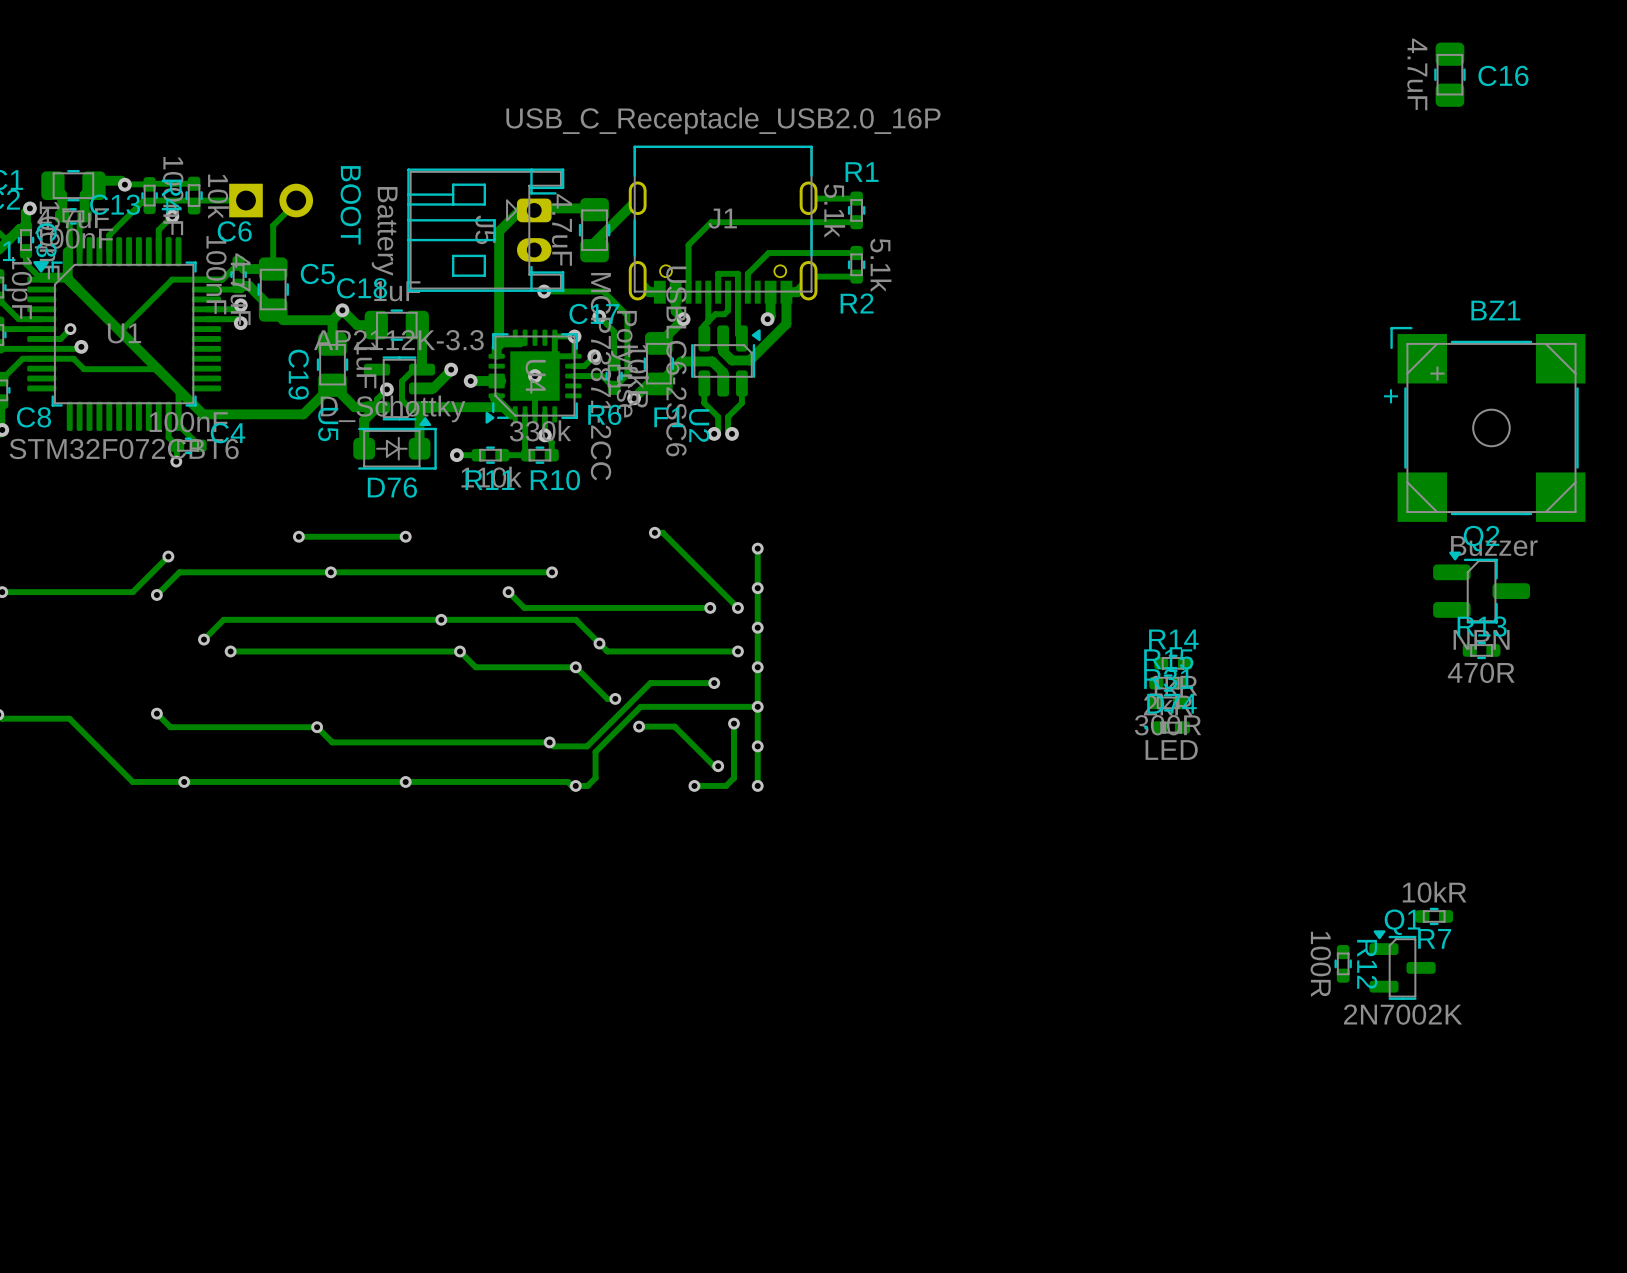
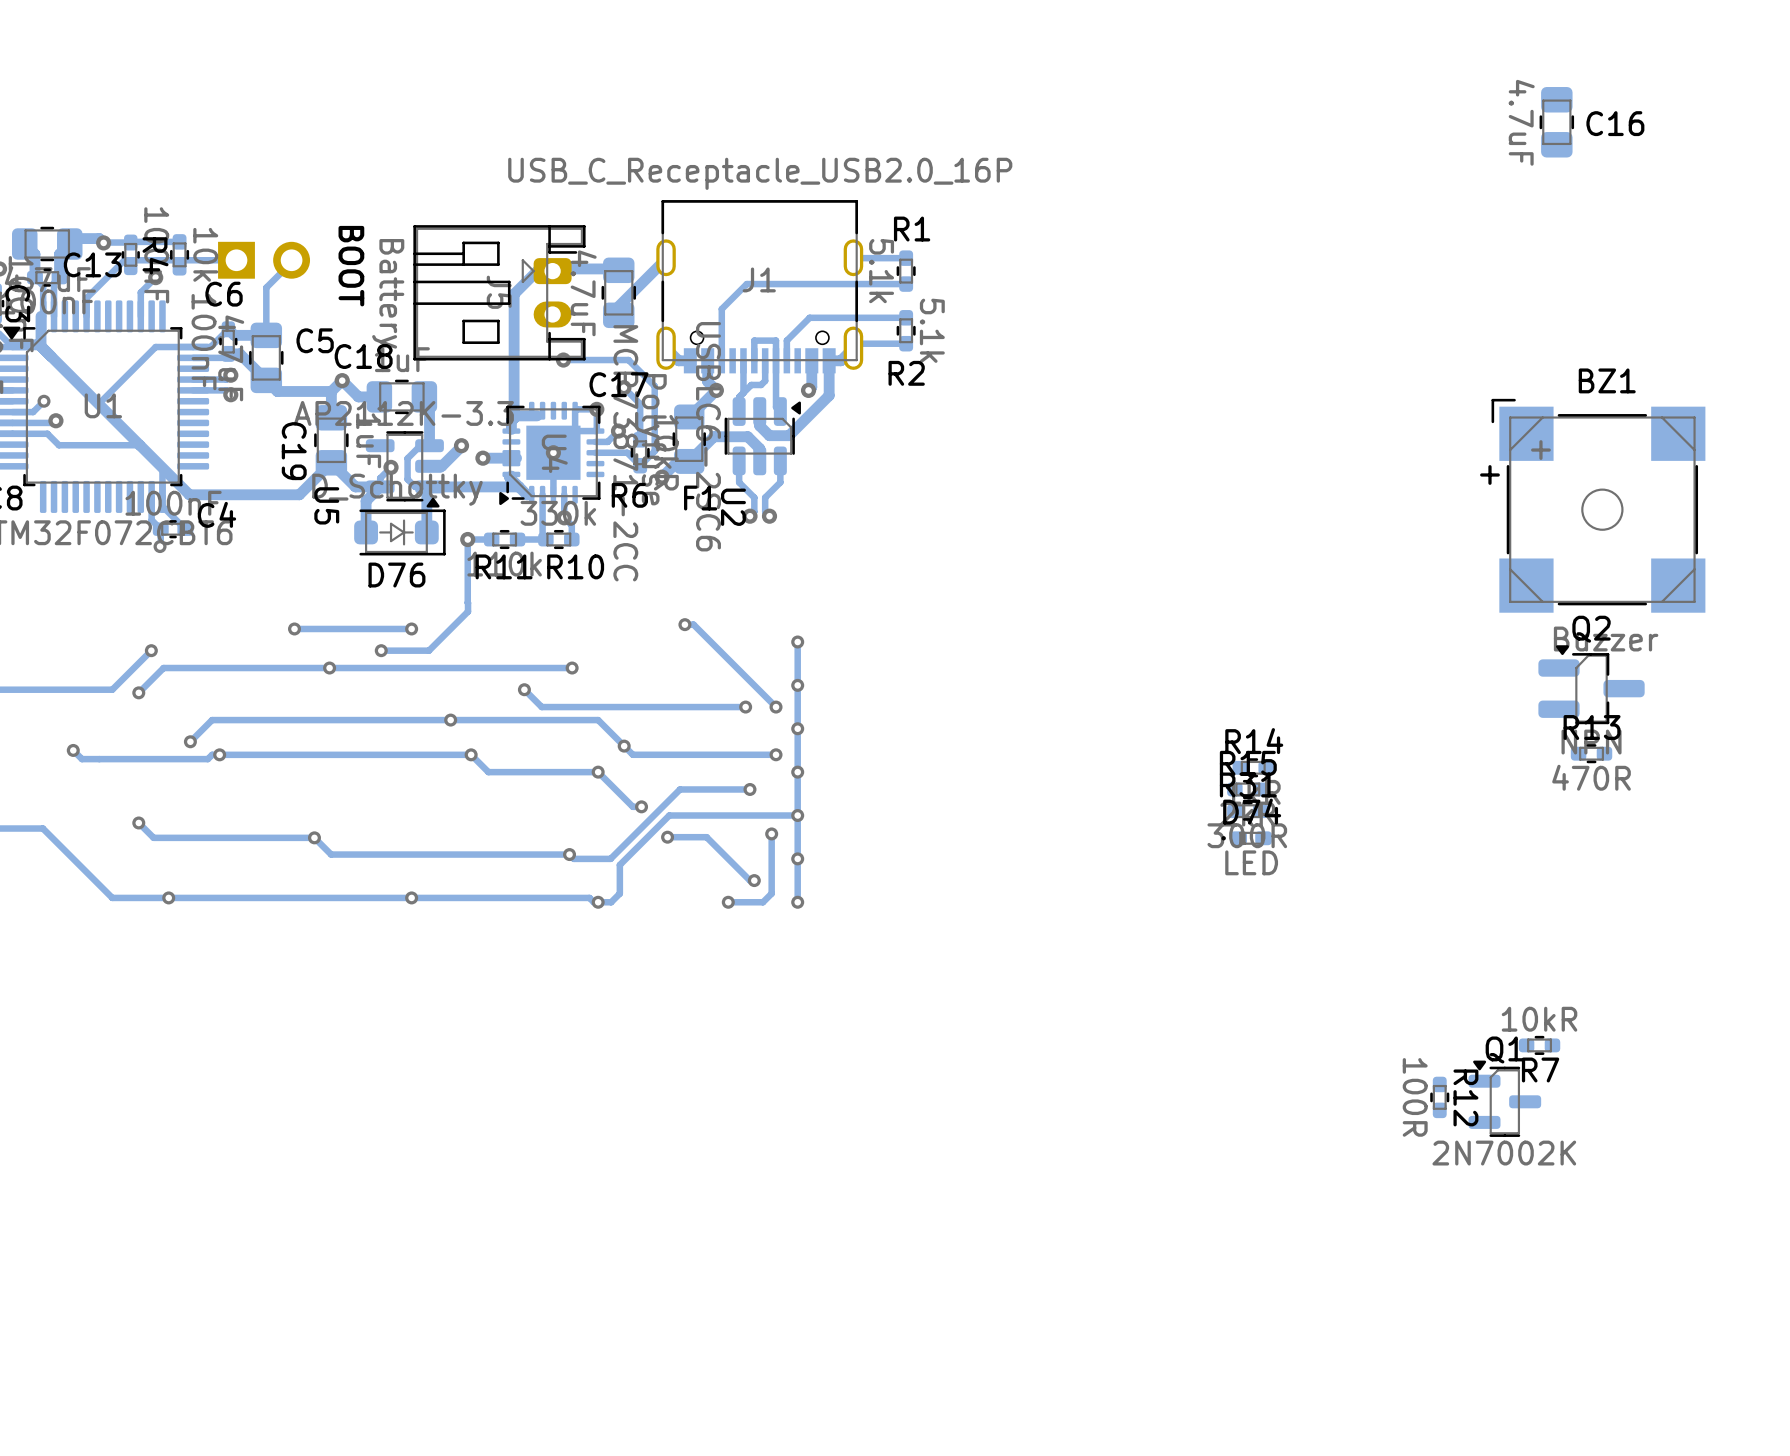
track: none -> (467, 539) (467, 602)
track: none -> (468, 602) (468, 611) (428, 650) (381, 650)
via: none -> (381, 650)
track: none -> (73, 750) (81, 759) (207, 759) (212, 754) (219, 754)
via: none -> (73, 750)

